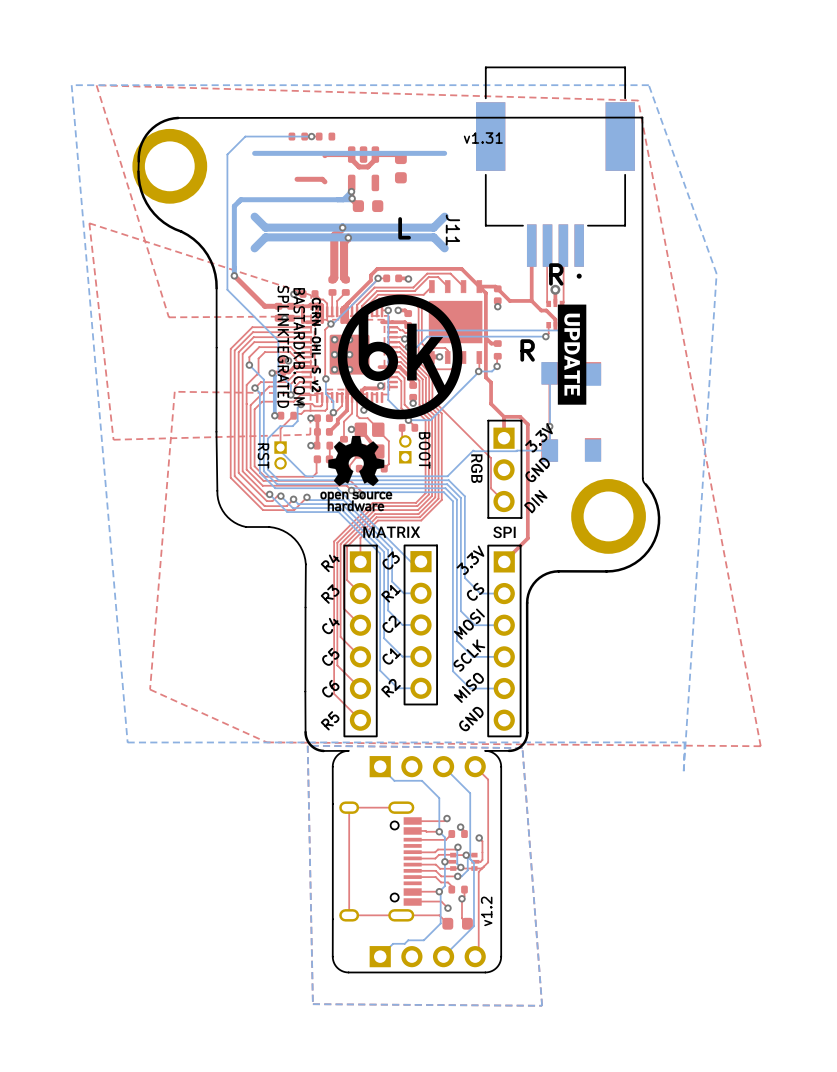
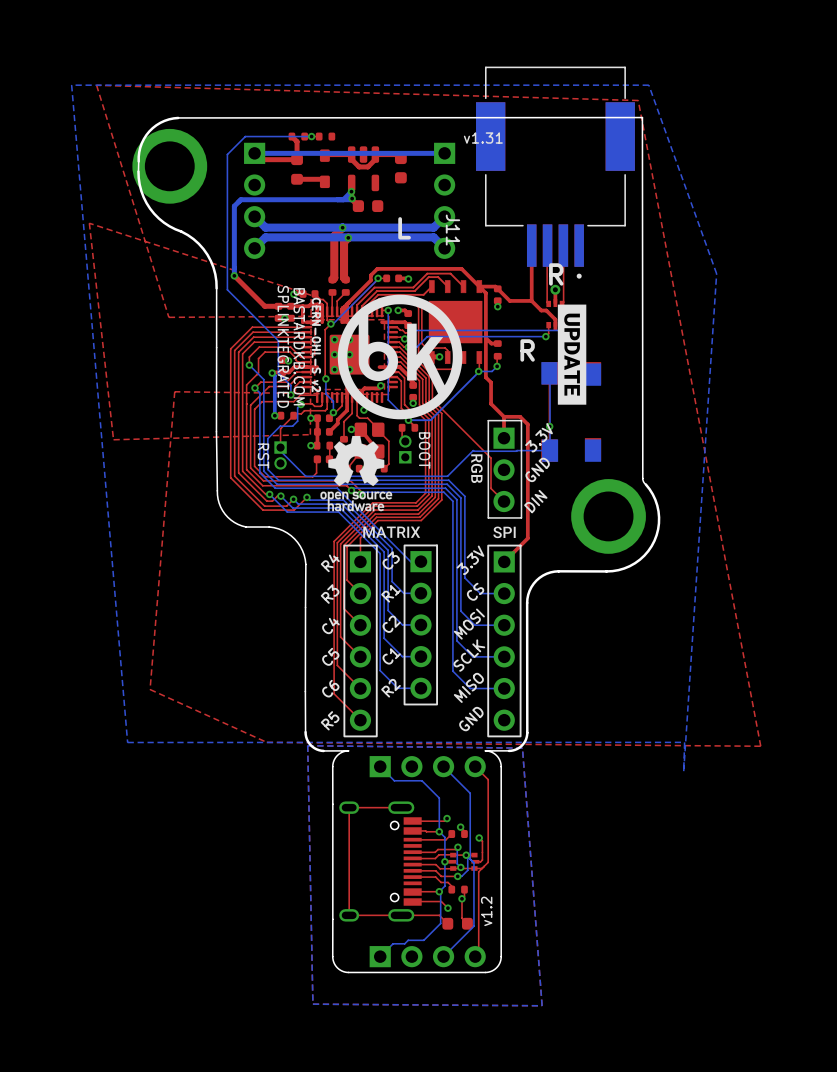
top track: none -> (291, 136) (297, 141) (297, 159) (260, 159) (254, 153)
part: none -> (324, 168)
part: none -> (297, 169)
part: none -> (254, 200)
part: none -> (444, 200)

